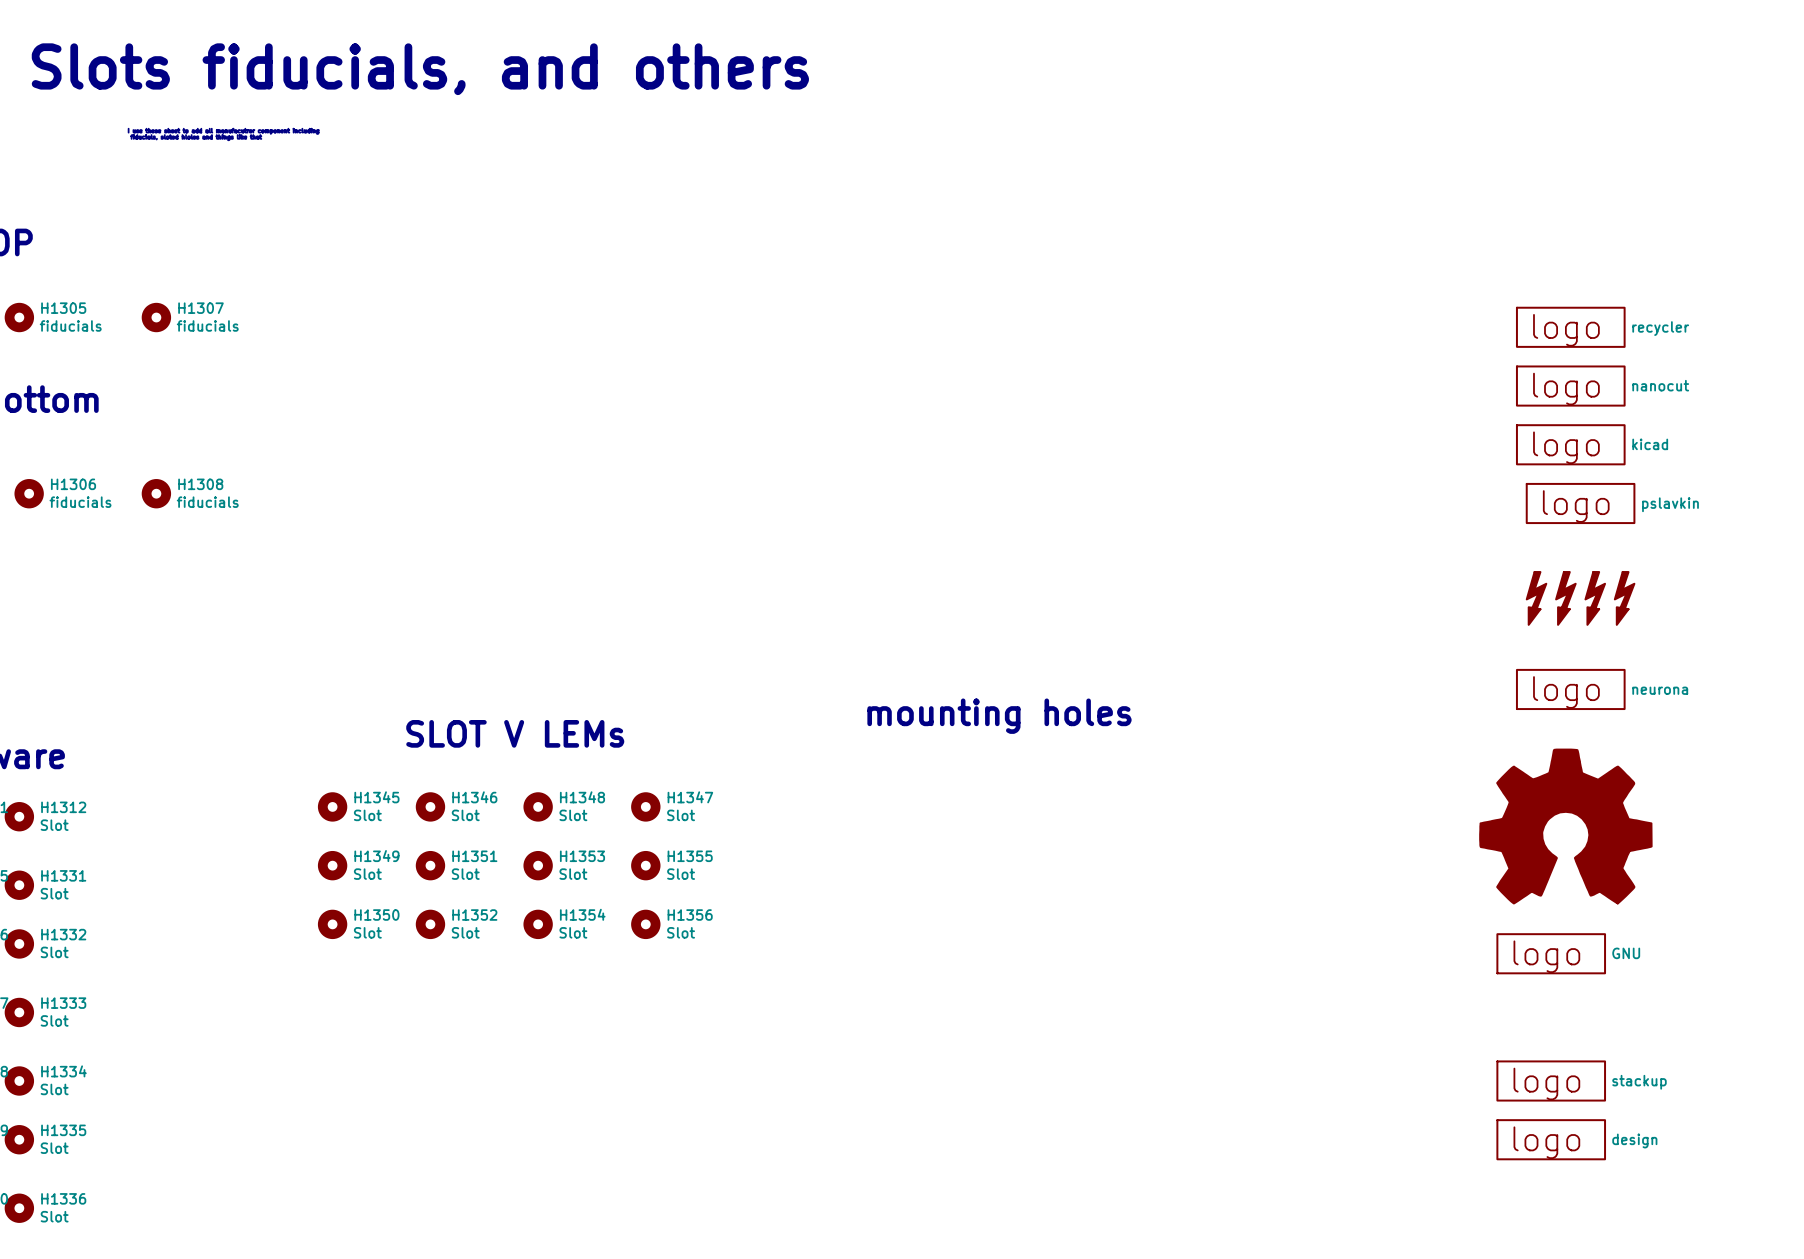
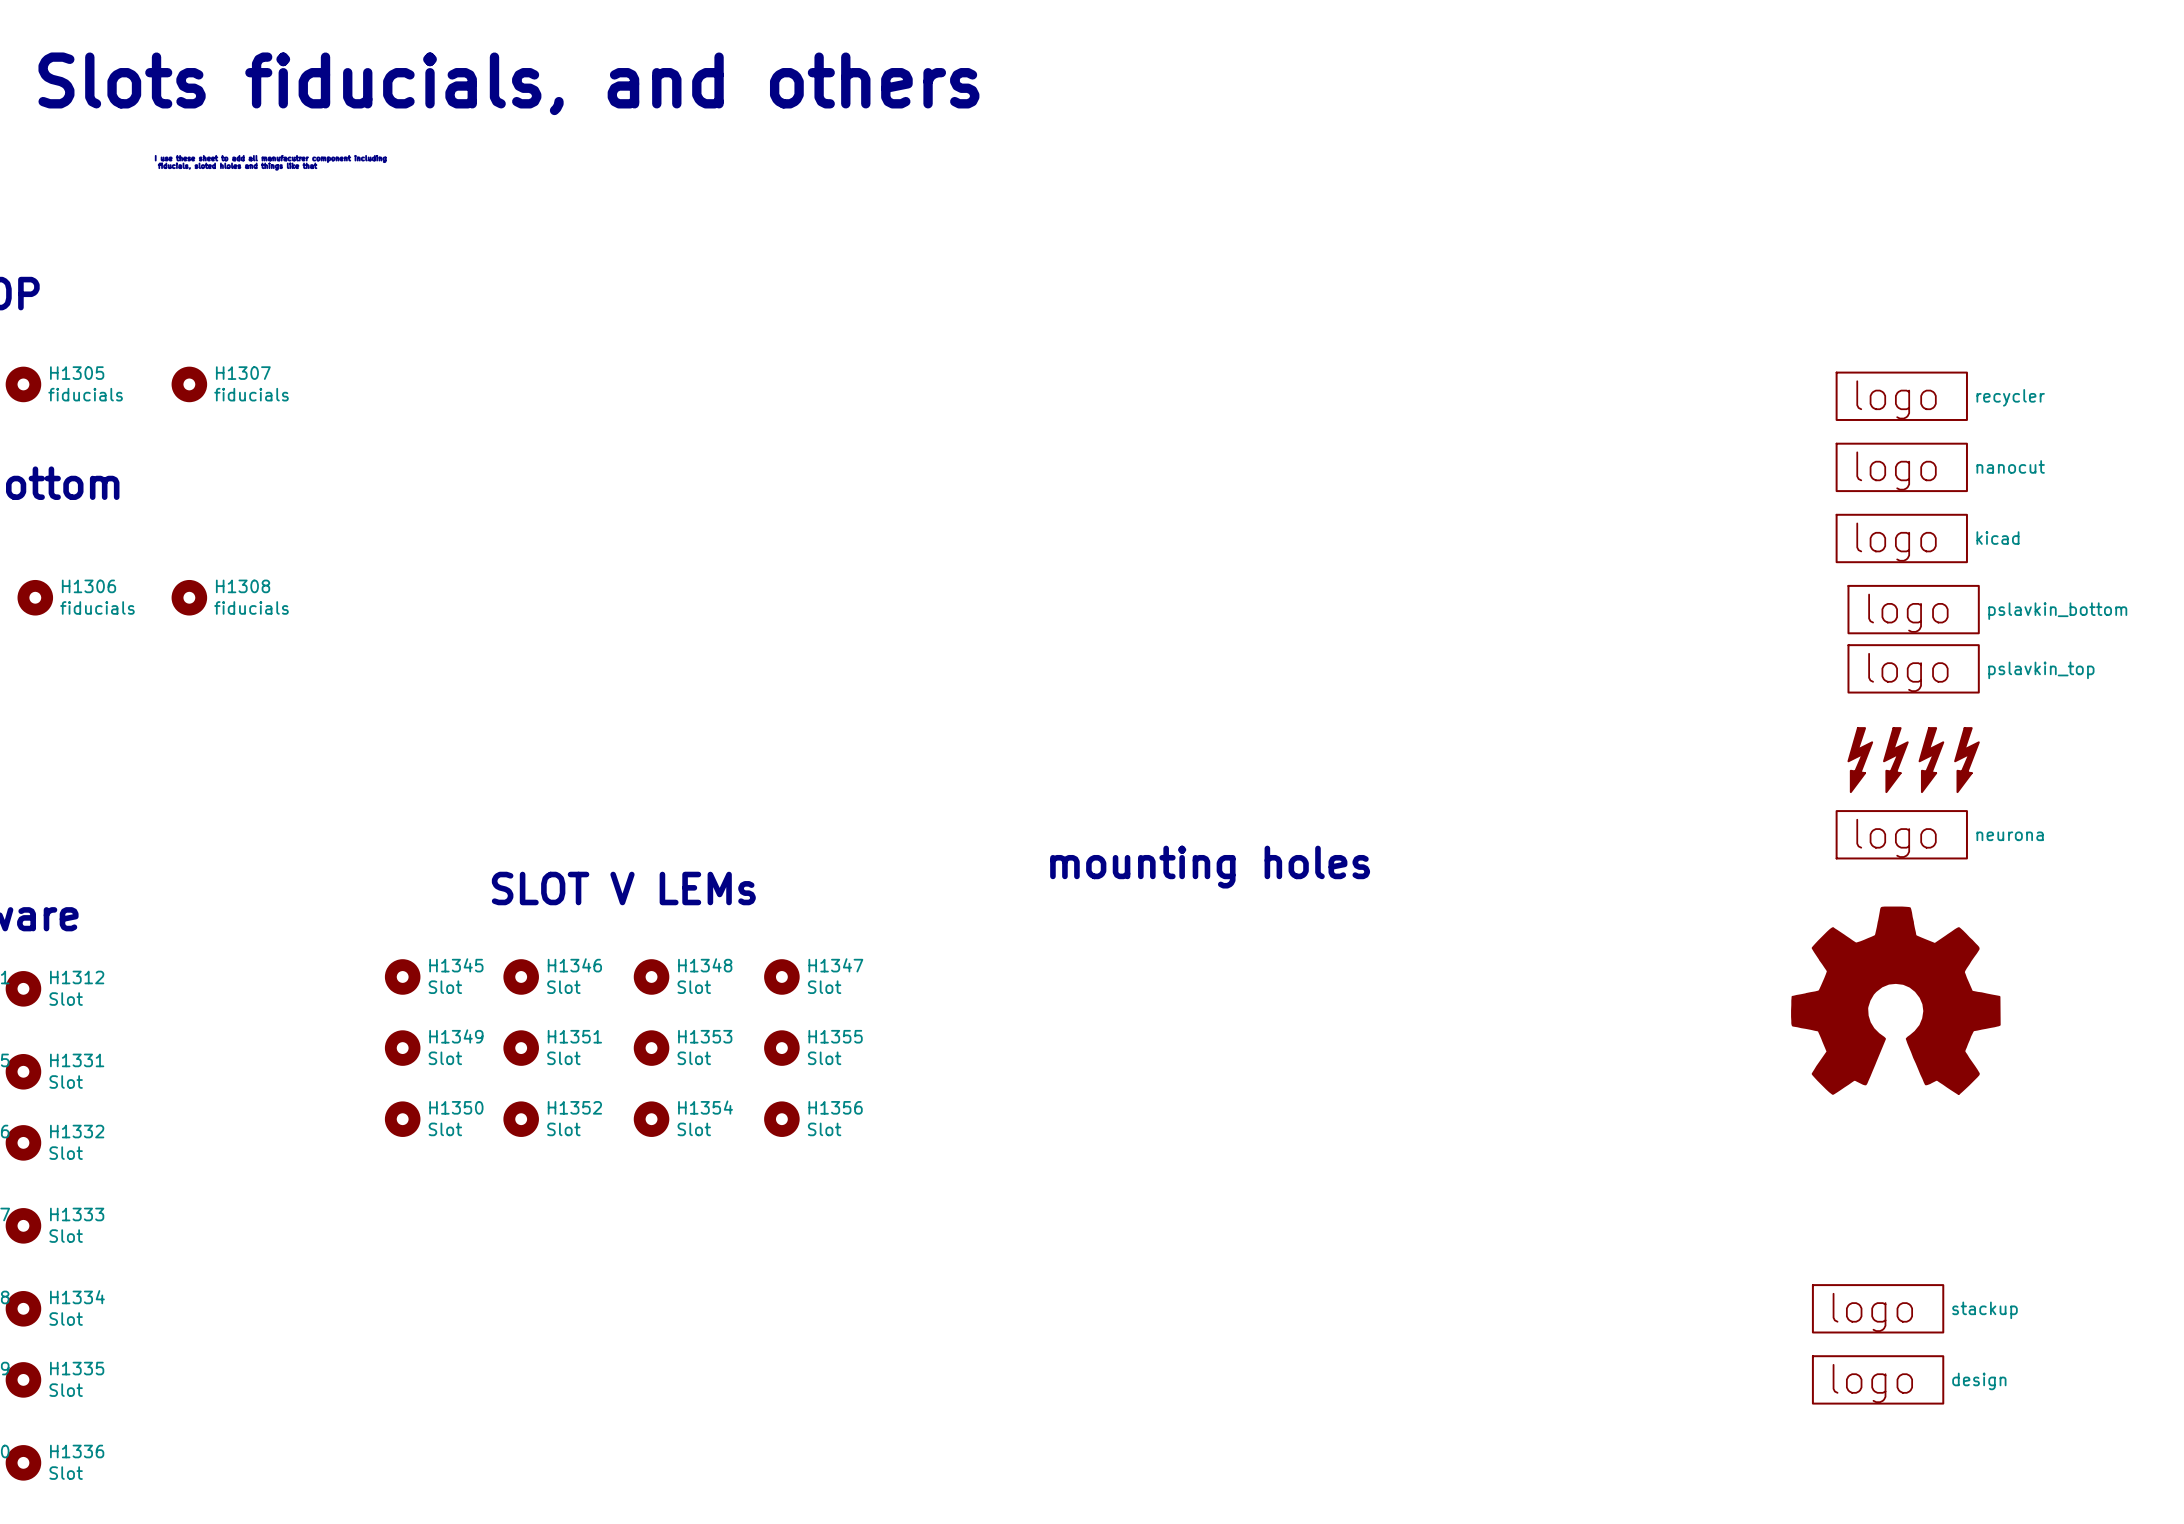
part value: pslavkin (1670, 504) -> pslavkin_bottom (2057, 611)
part: none -> pslavkin_top (1913, 668)
part: (1536, 598) -> none
part: (1565, 598) -> none
part: (1595, 598) -> none
part: (1624, 598) -> none
part: none -> (1860, 760)
part: none -> (1895, 760)
part: none -> (1931, 760)
part: none -> (1966, 760)
part: GNU (1551, 953) -> none

